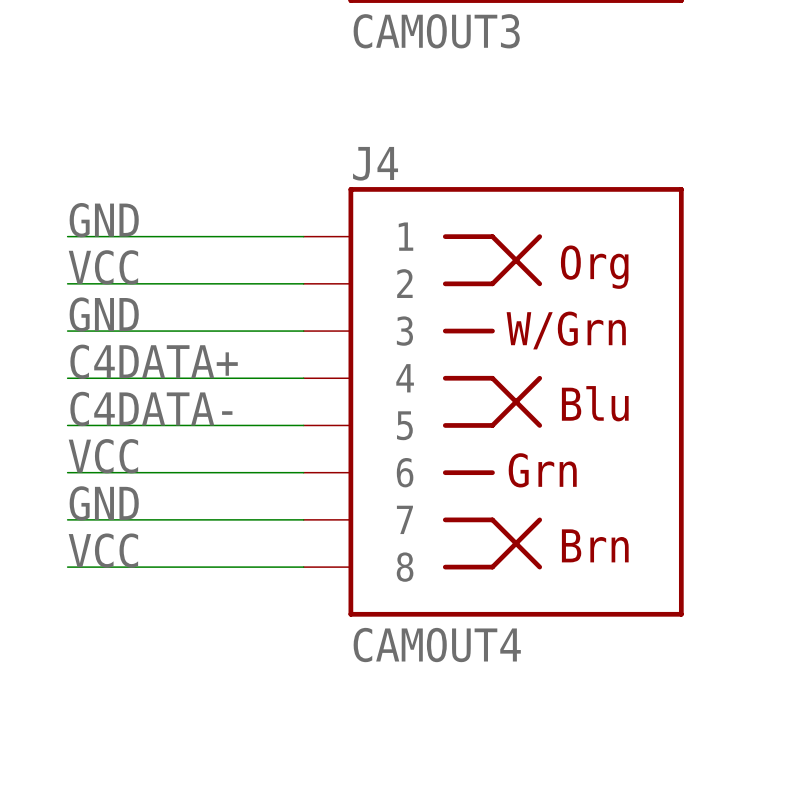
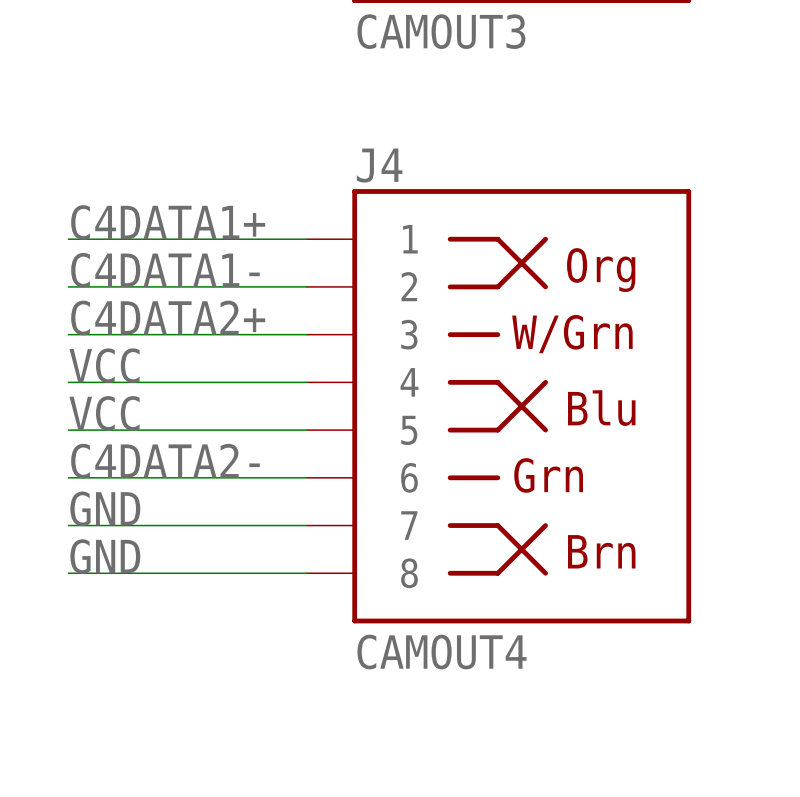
label: GND (104, 220) -> C4DATA1+ (168, 222)
label: VCC (103, 267) -> C4DATA1- (165, 270)
label: GND (104, 314) -> C4DATA2+ (168, 317)
label: C4DATA+ (154, 361) -> VCC (104, 365)
label: C4DATA- (151, 408) -> VCC (104, 413)
label: VCC (103, 456) -> C4DATA2- (165, 461)
label: VCC (103, 550) -> GND (105, 556)

